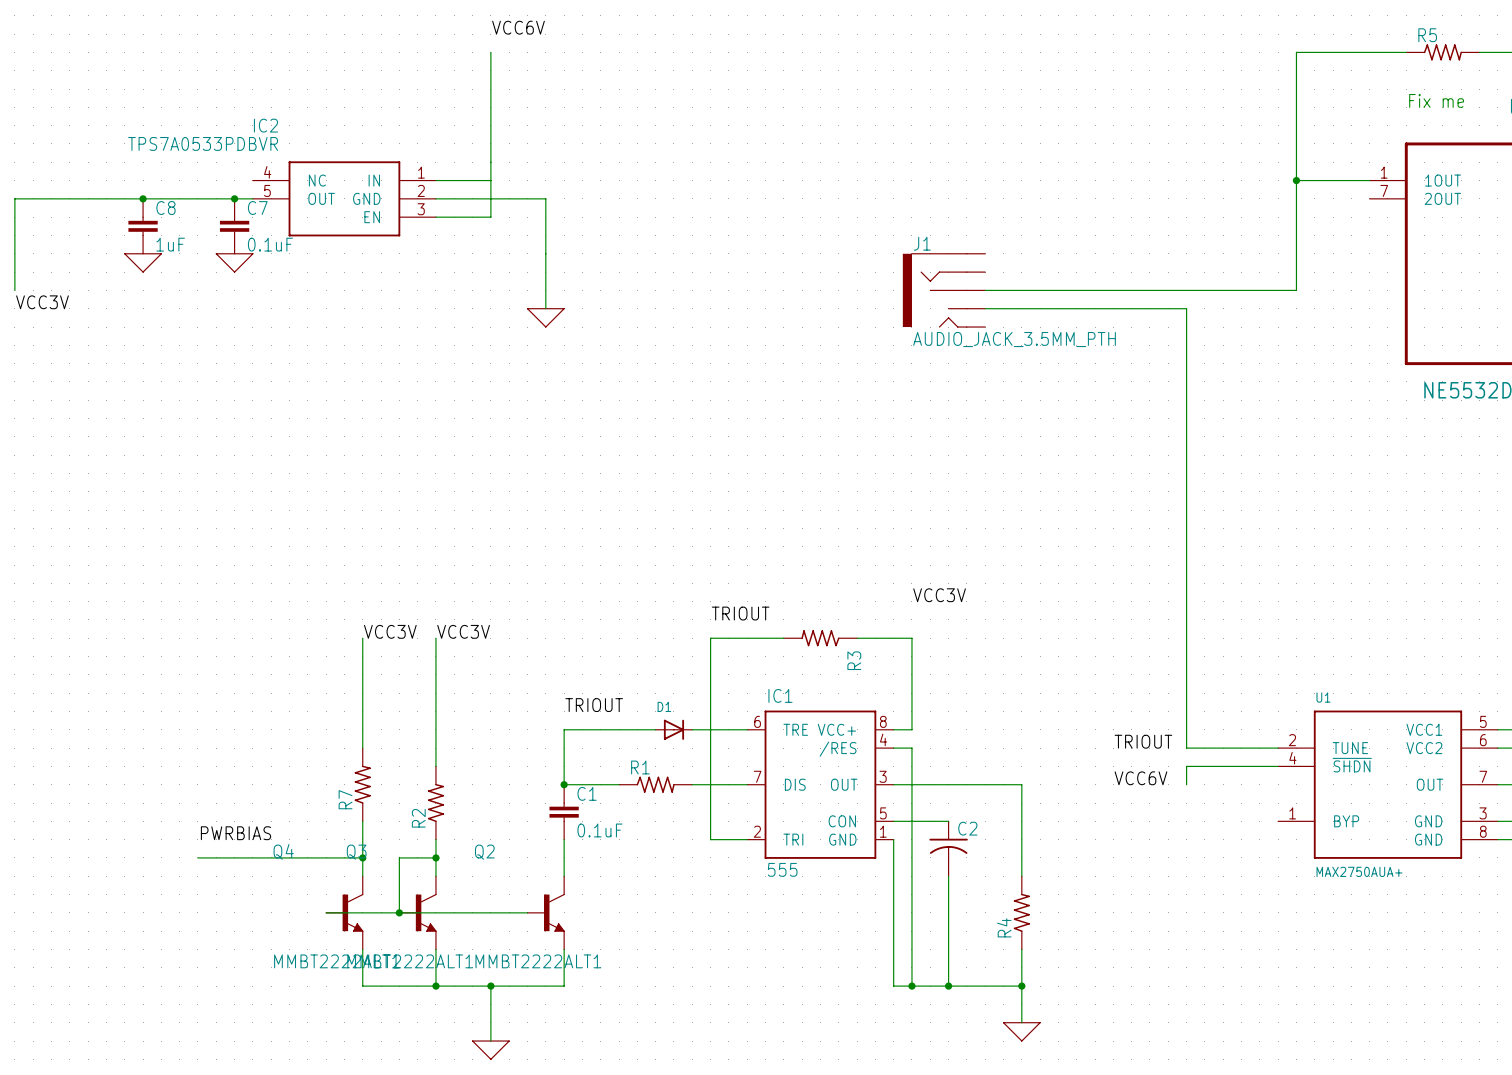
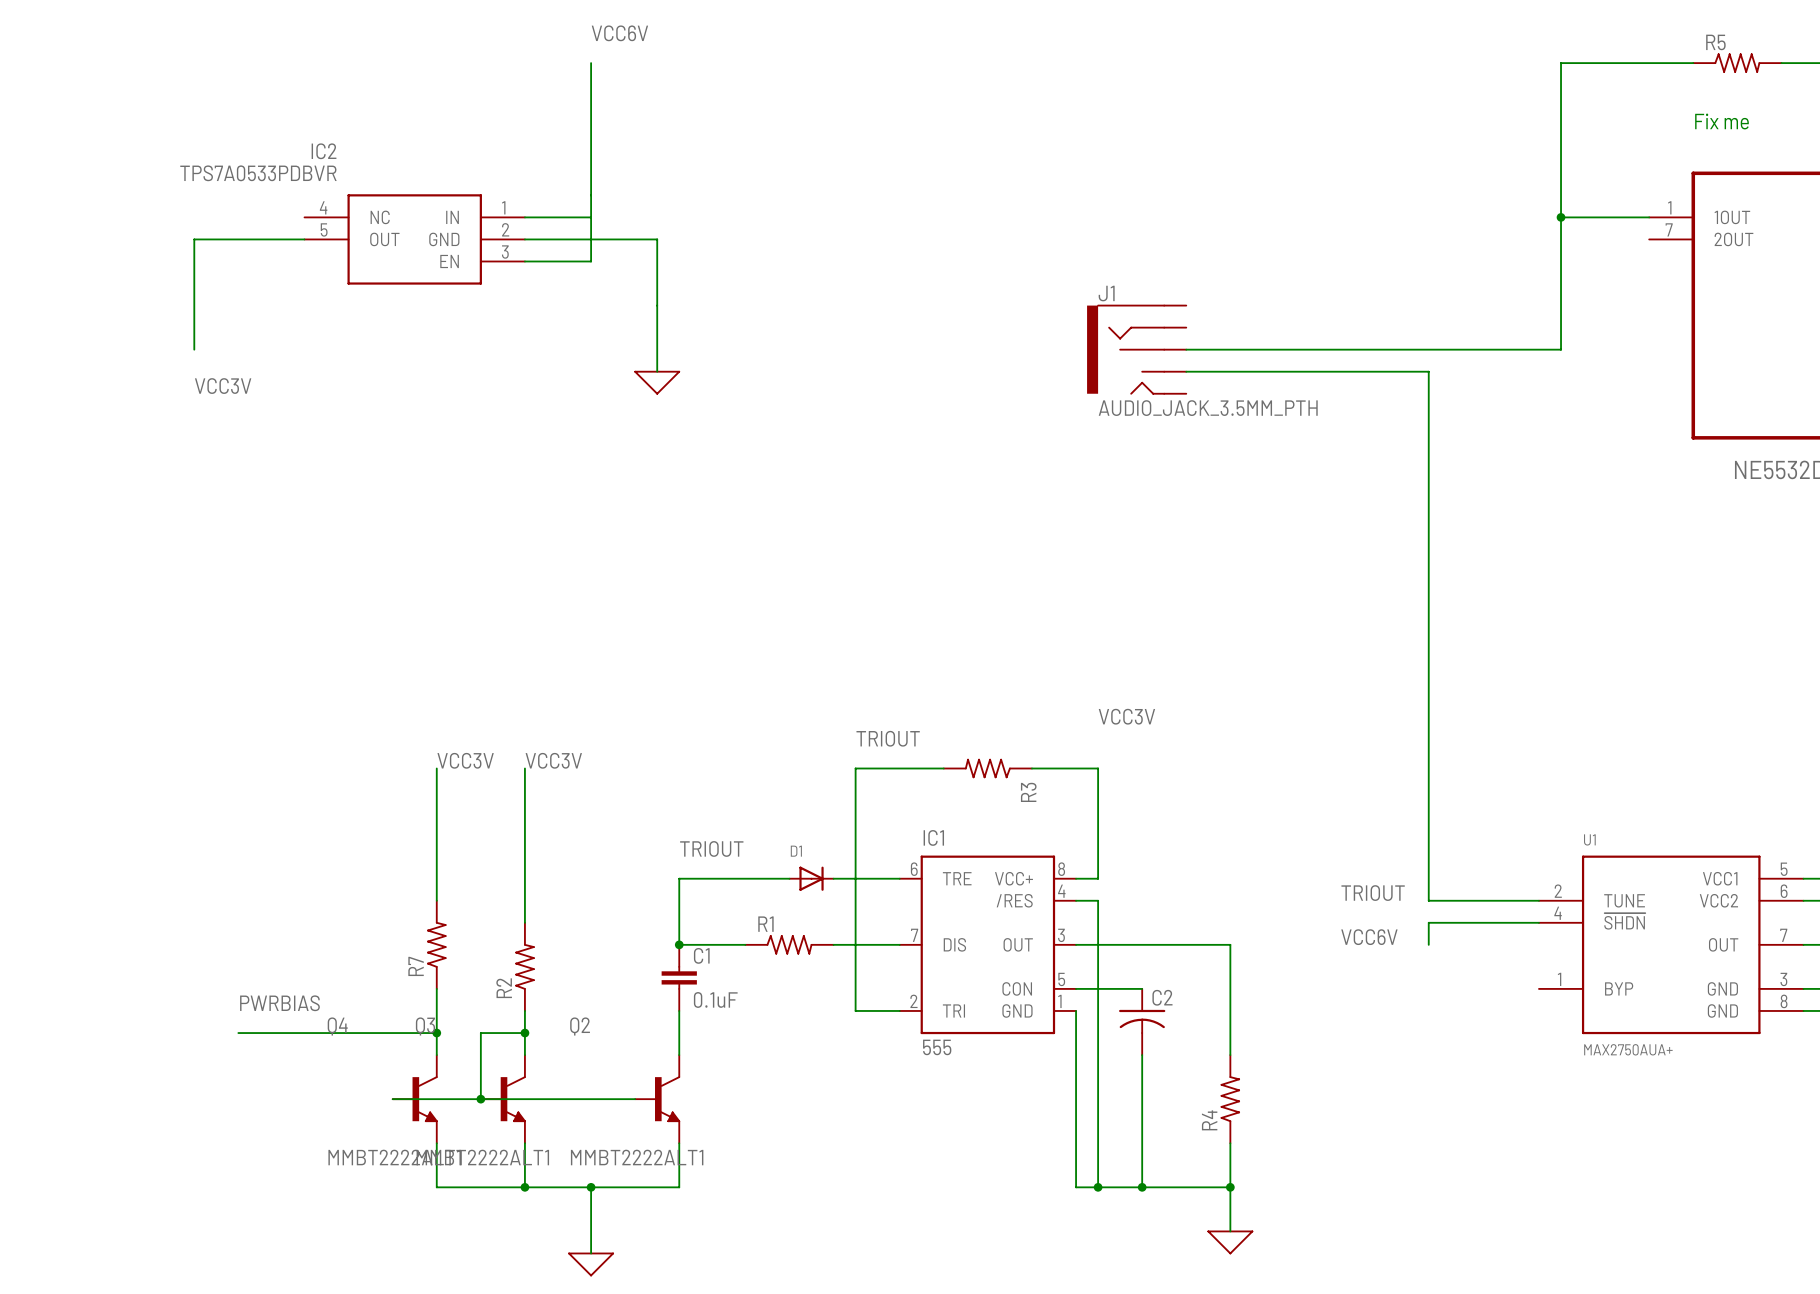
junction: (143, 198) -> none
wire: (161, 198) (14, 198) (14, 290) -> (194, 239) (194, 349)
junction: (234, 198) -> none
C8: 1uF (143, 226) -> none
C7: 0.1uF (234, 226) -> none
power symbol: (143, 262) -> none
power symbol: (234, 262) -> none
label position: VCC3V (42, 302) -> VCC3V (223, 386)

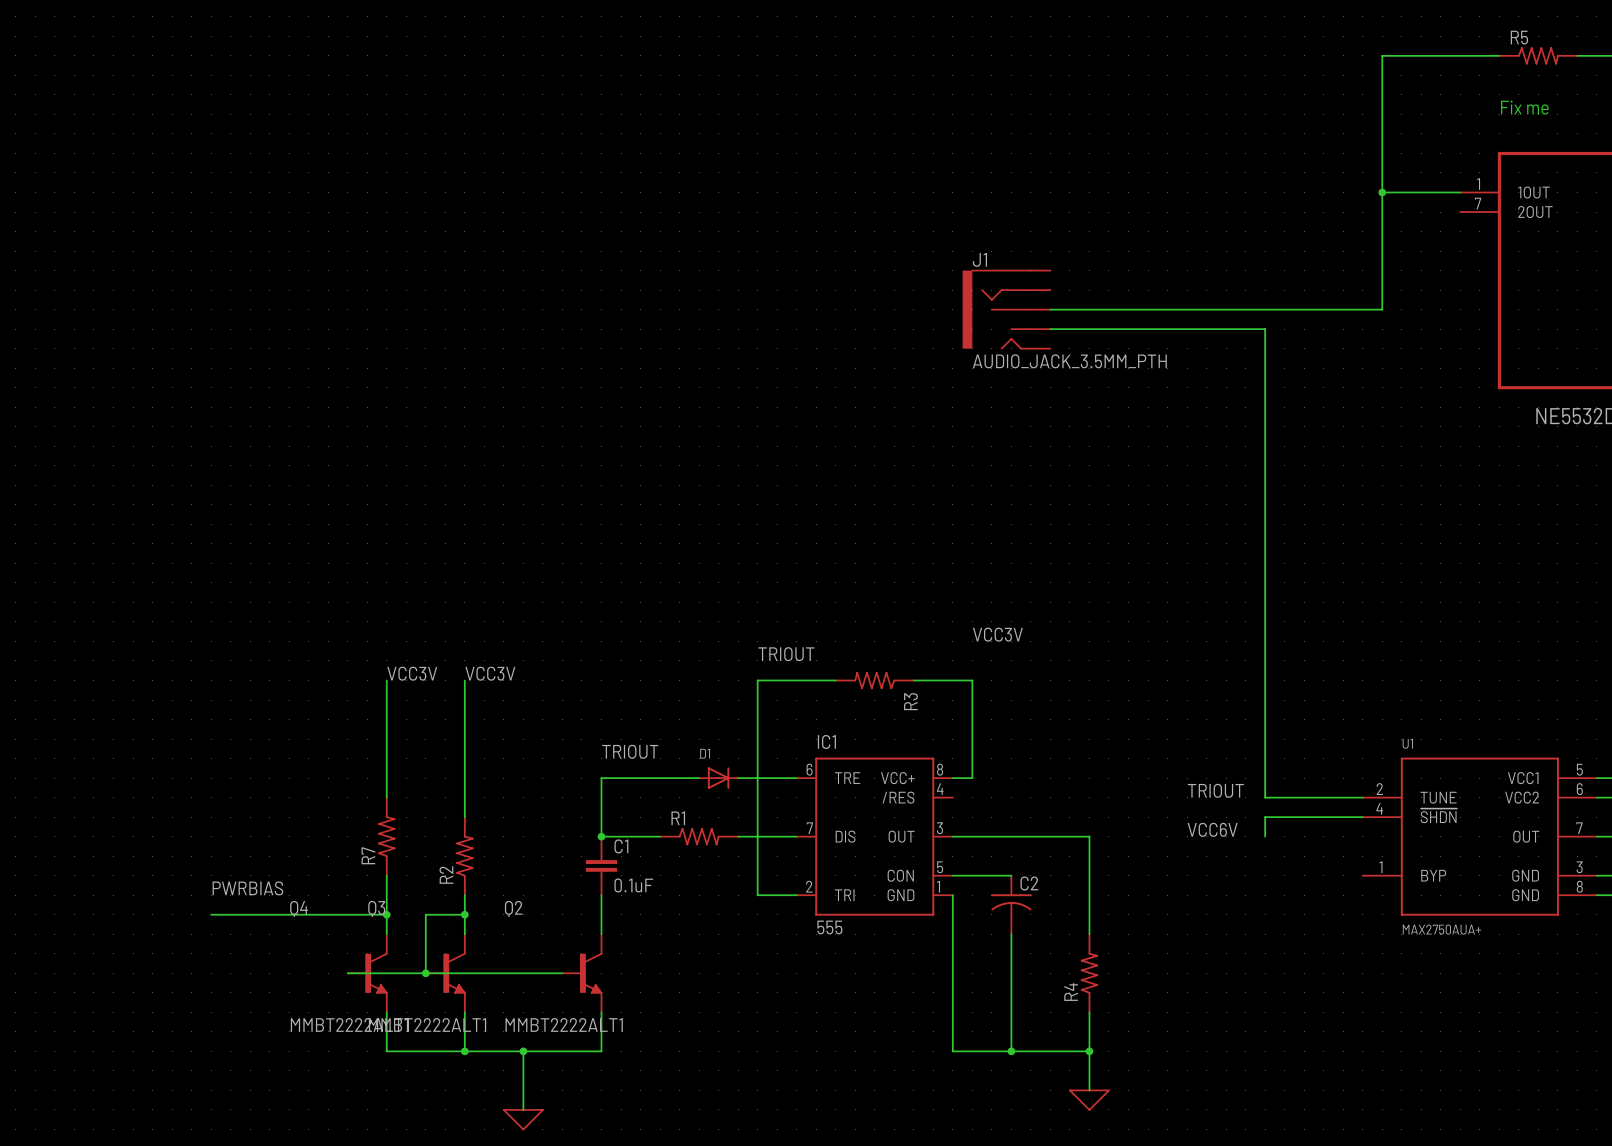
label: VCC6V (619, 33) -> none
wire: (591, 63) (591, 261) (524, 261) -> none
wire: (524, 217) (591, 217) -> none
wire: (304, 239) (194, 239) (194, 349) -> none
IC2: TPS7A0533PDBVR (414, 239) -> none
wire: (524, 239) (657, 239) (657, 371) -> none
power symbol: (657, 382) -> none
label: VCC3V (223, 386) -> none
wire: (1076, 900) (1098, 900) (1098, 1187) -> none
junction: (1098, 1187) -> none

